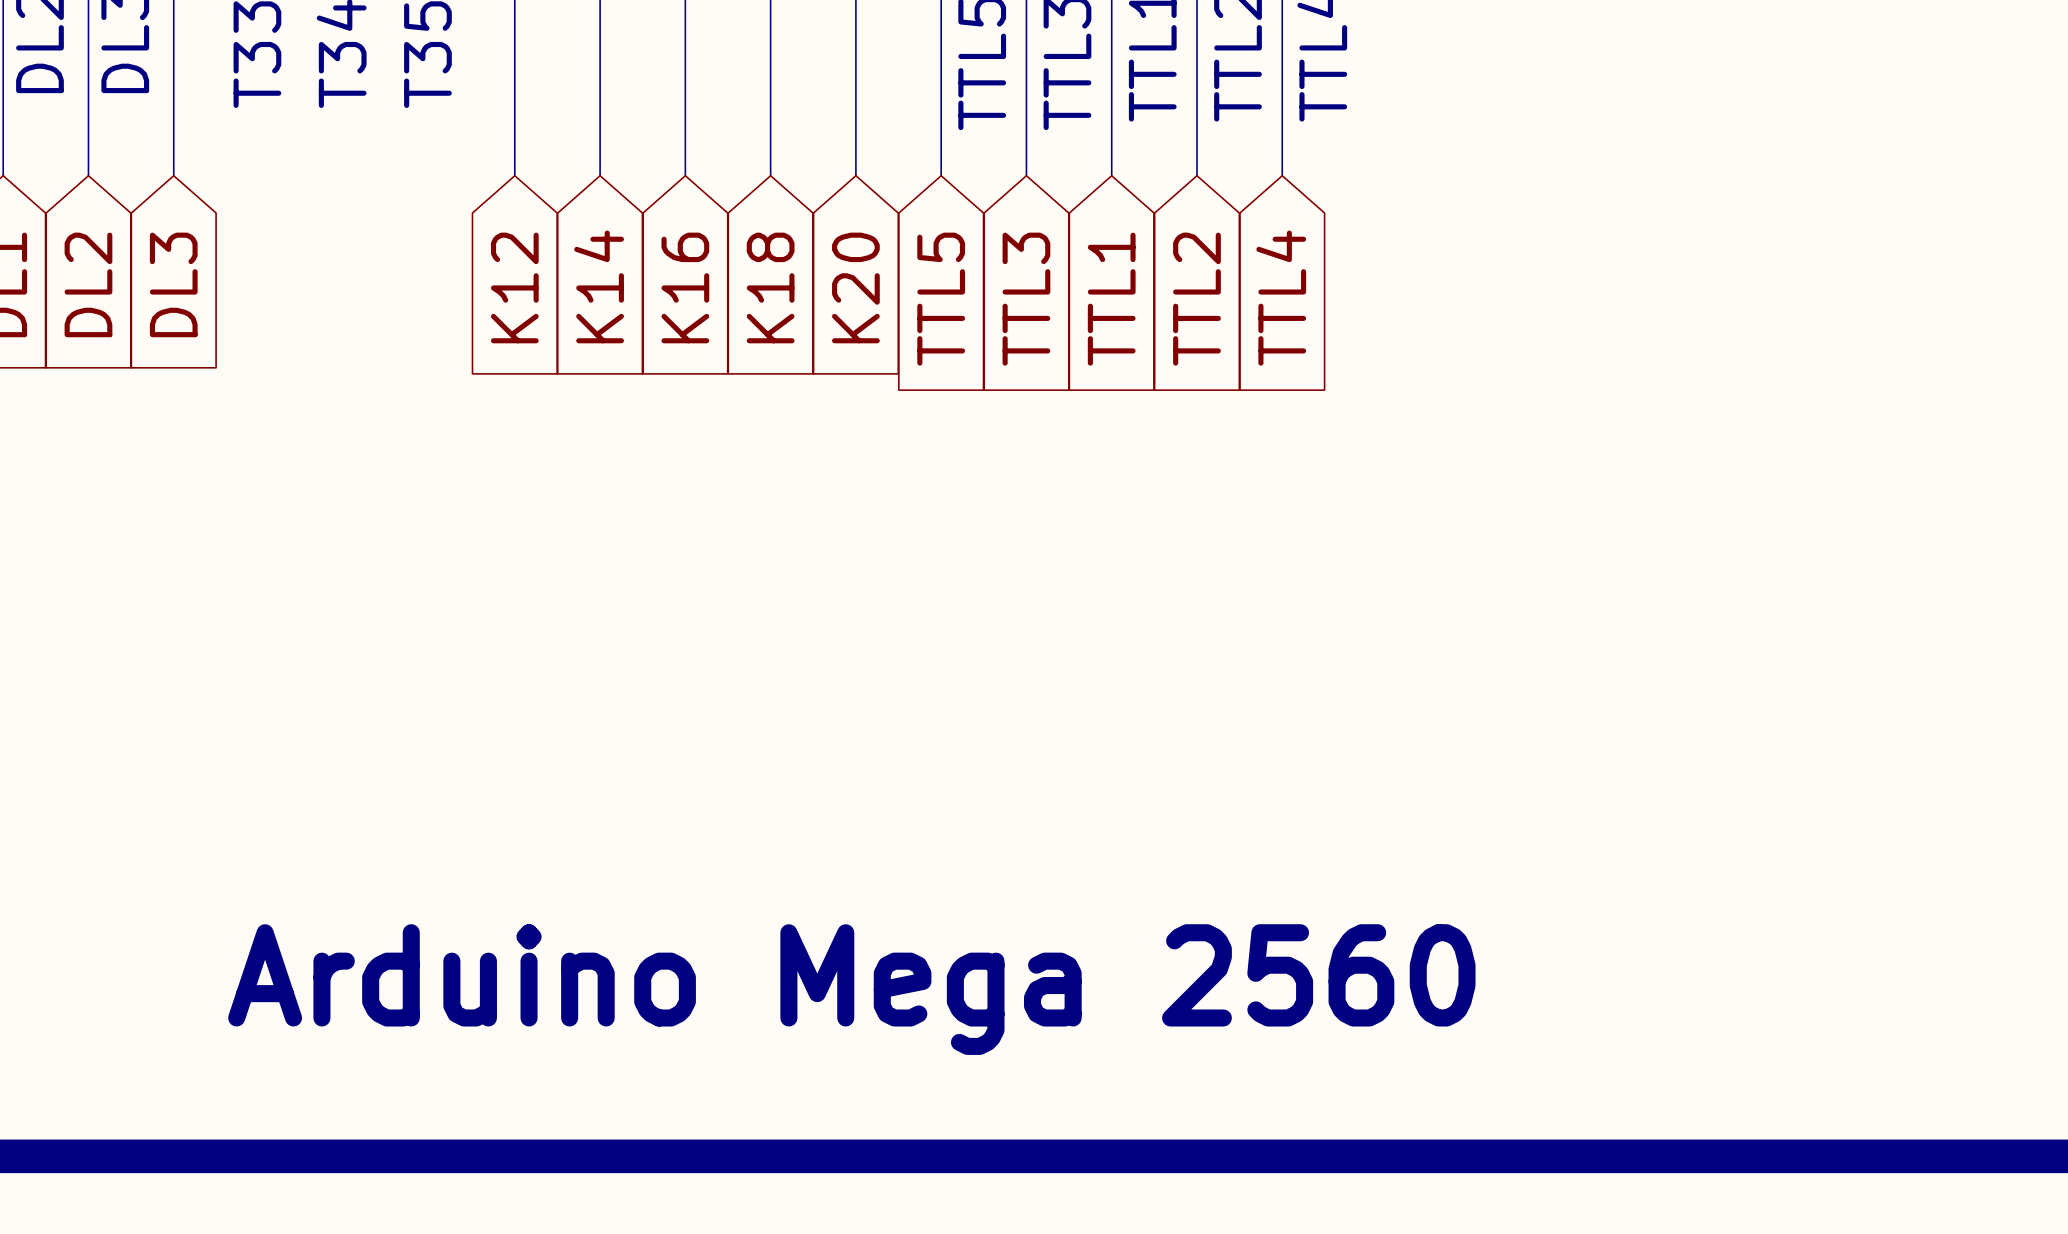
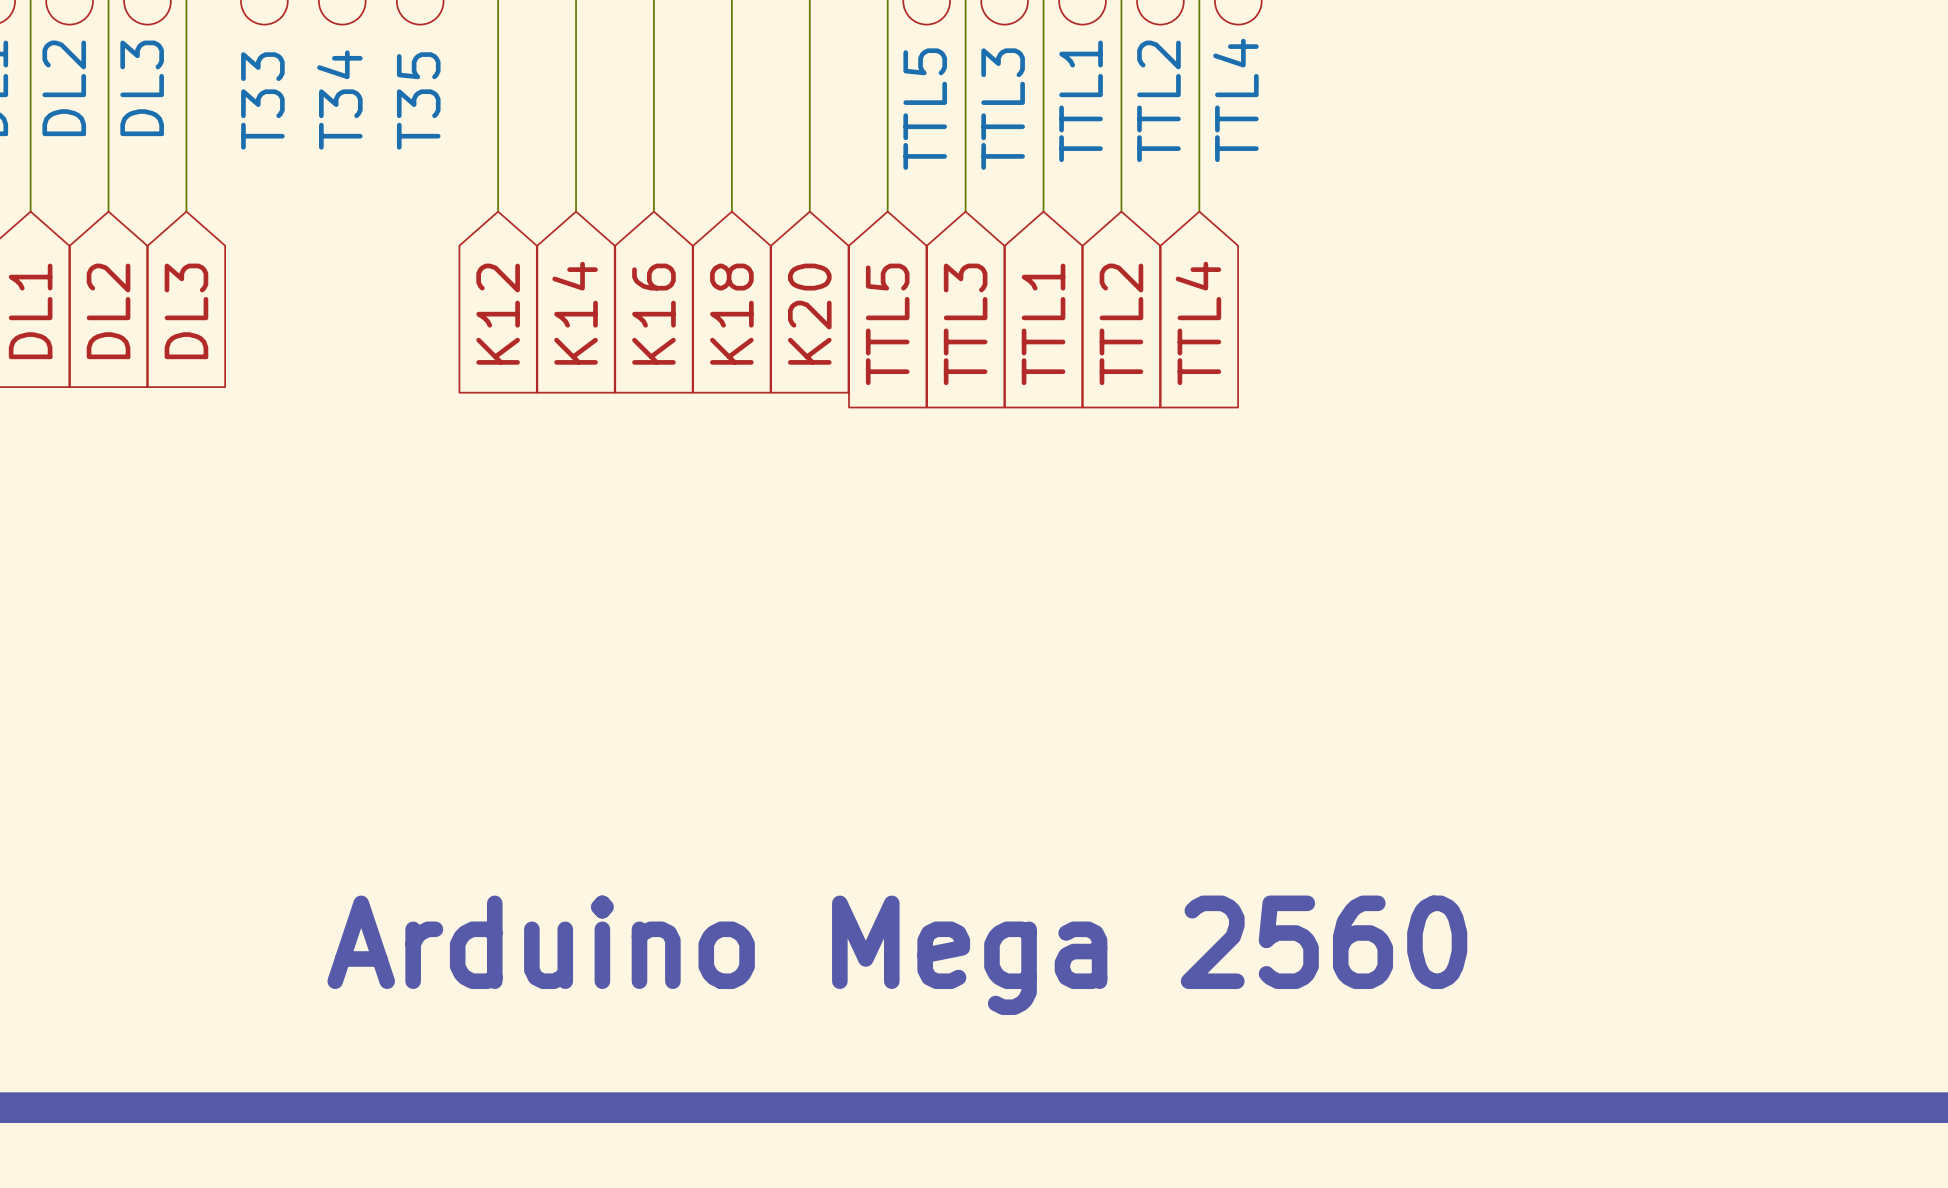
text position: Arduino Mega 2560 (851, 989) -> Arduino Mega 2560 (897, 955)

